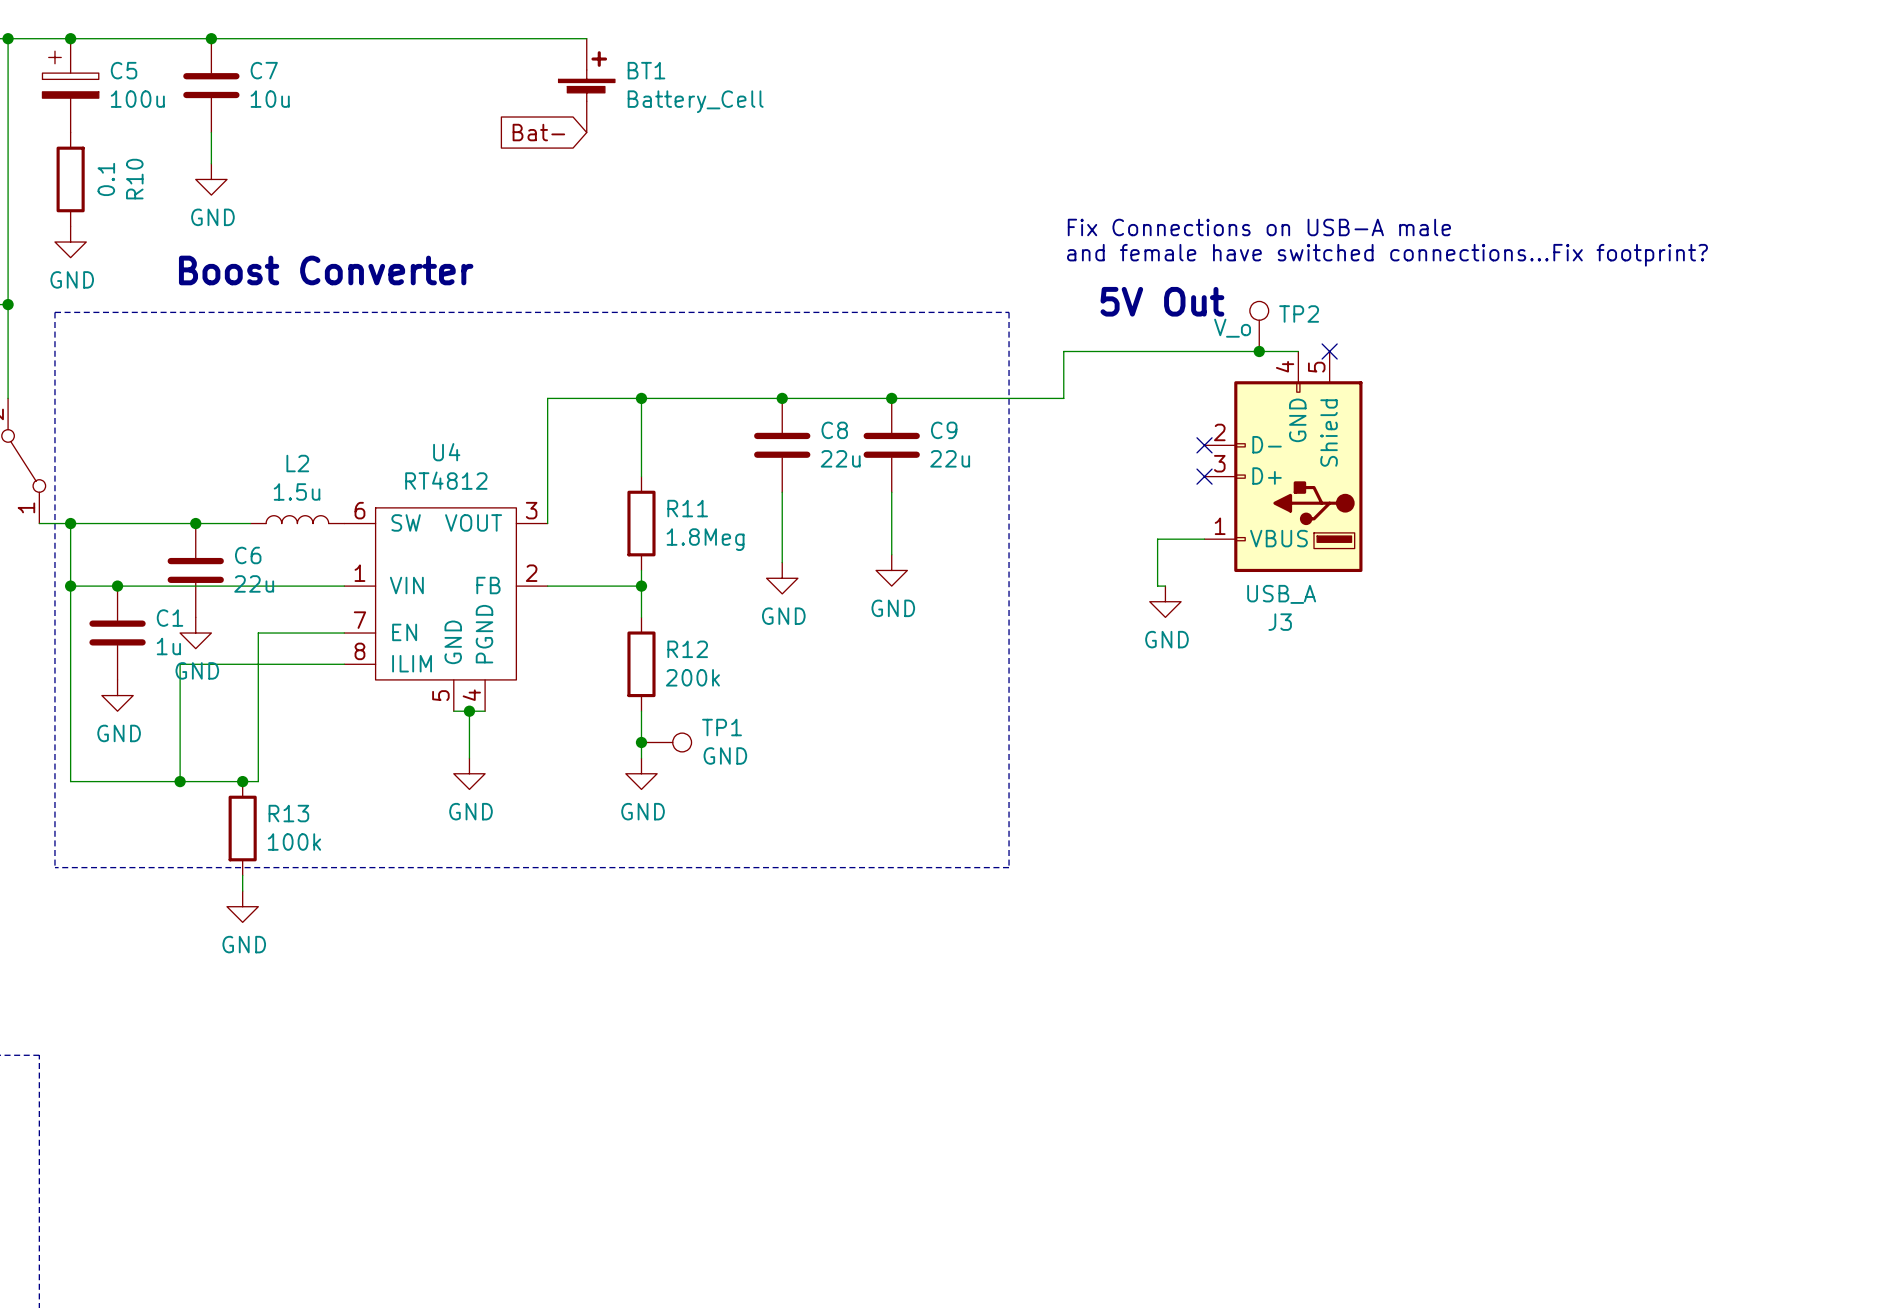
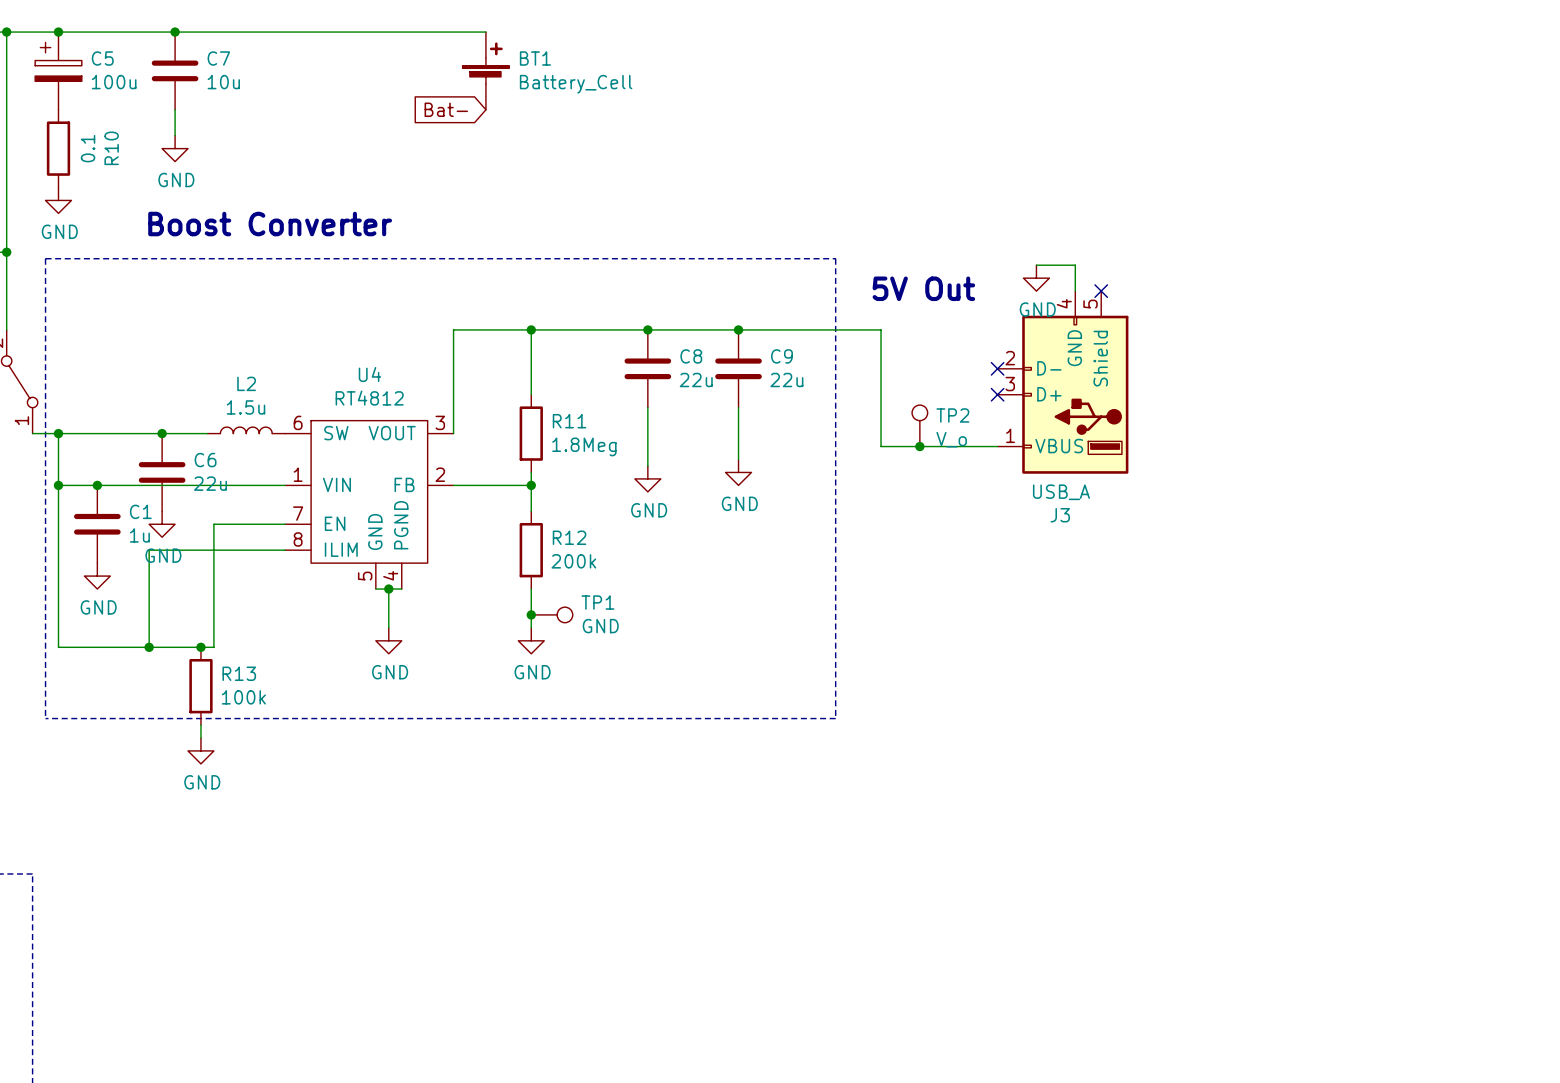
text: Fix Connections on USB-A male (1259, 227) -> none
text: and female have switched connections...Fix footprint? (1387, 255) -> none
text position: 5V Out (1162, 301) -> 5V Out (923, 288)
TP2 position: (1259, 326) -> (919, 425)
TP2 value position: V_o (1232, 328) -> V_o (951, 439)
junction: (1259, 351) -> none
wire: (1298, 351) (1063, 351) (1063, 398) -> (1075, 291) (1075, 265) (1036, 265)
junction: none -> (919, 446)
wire: (1157, 539) (1157, 586) (1165, 586) -> (958, 446) (881, 446) (881, 329)
power symbol position: GND (1165, 601) -> GND (1036, 278)

